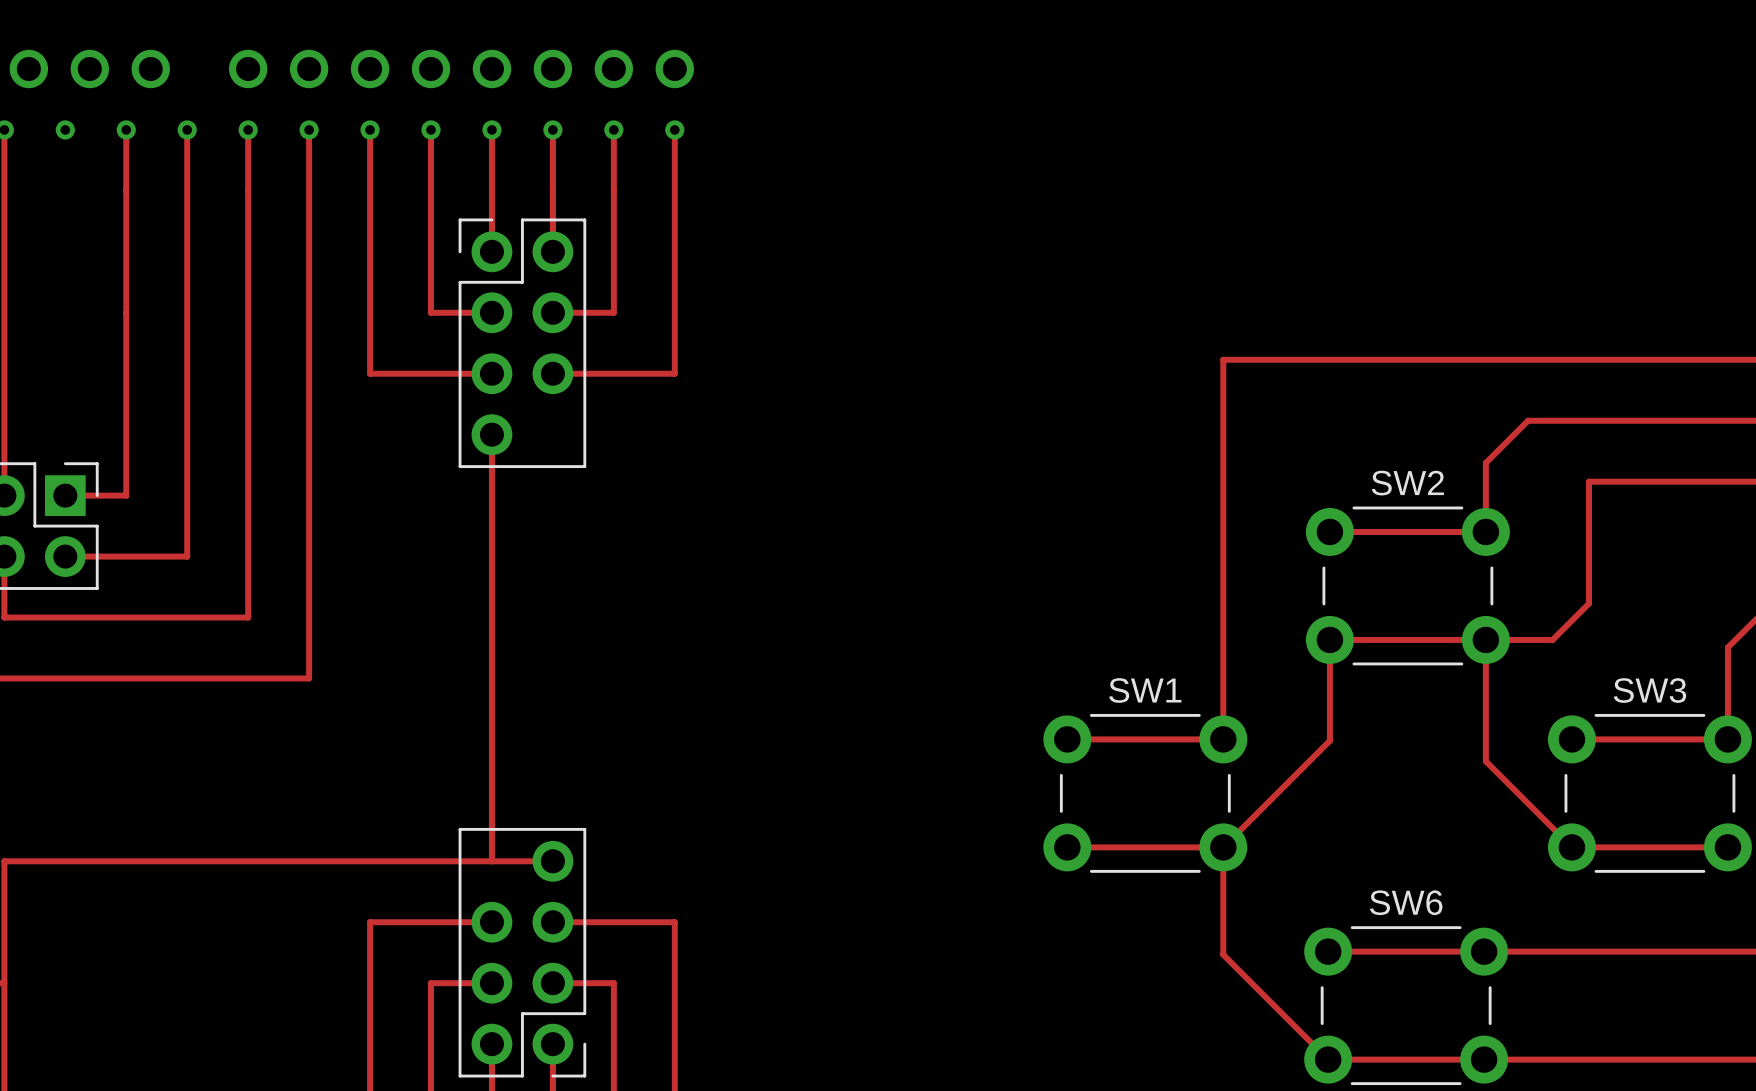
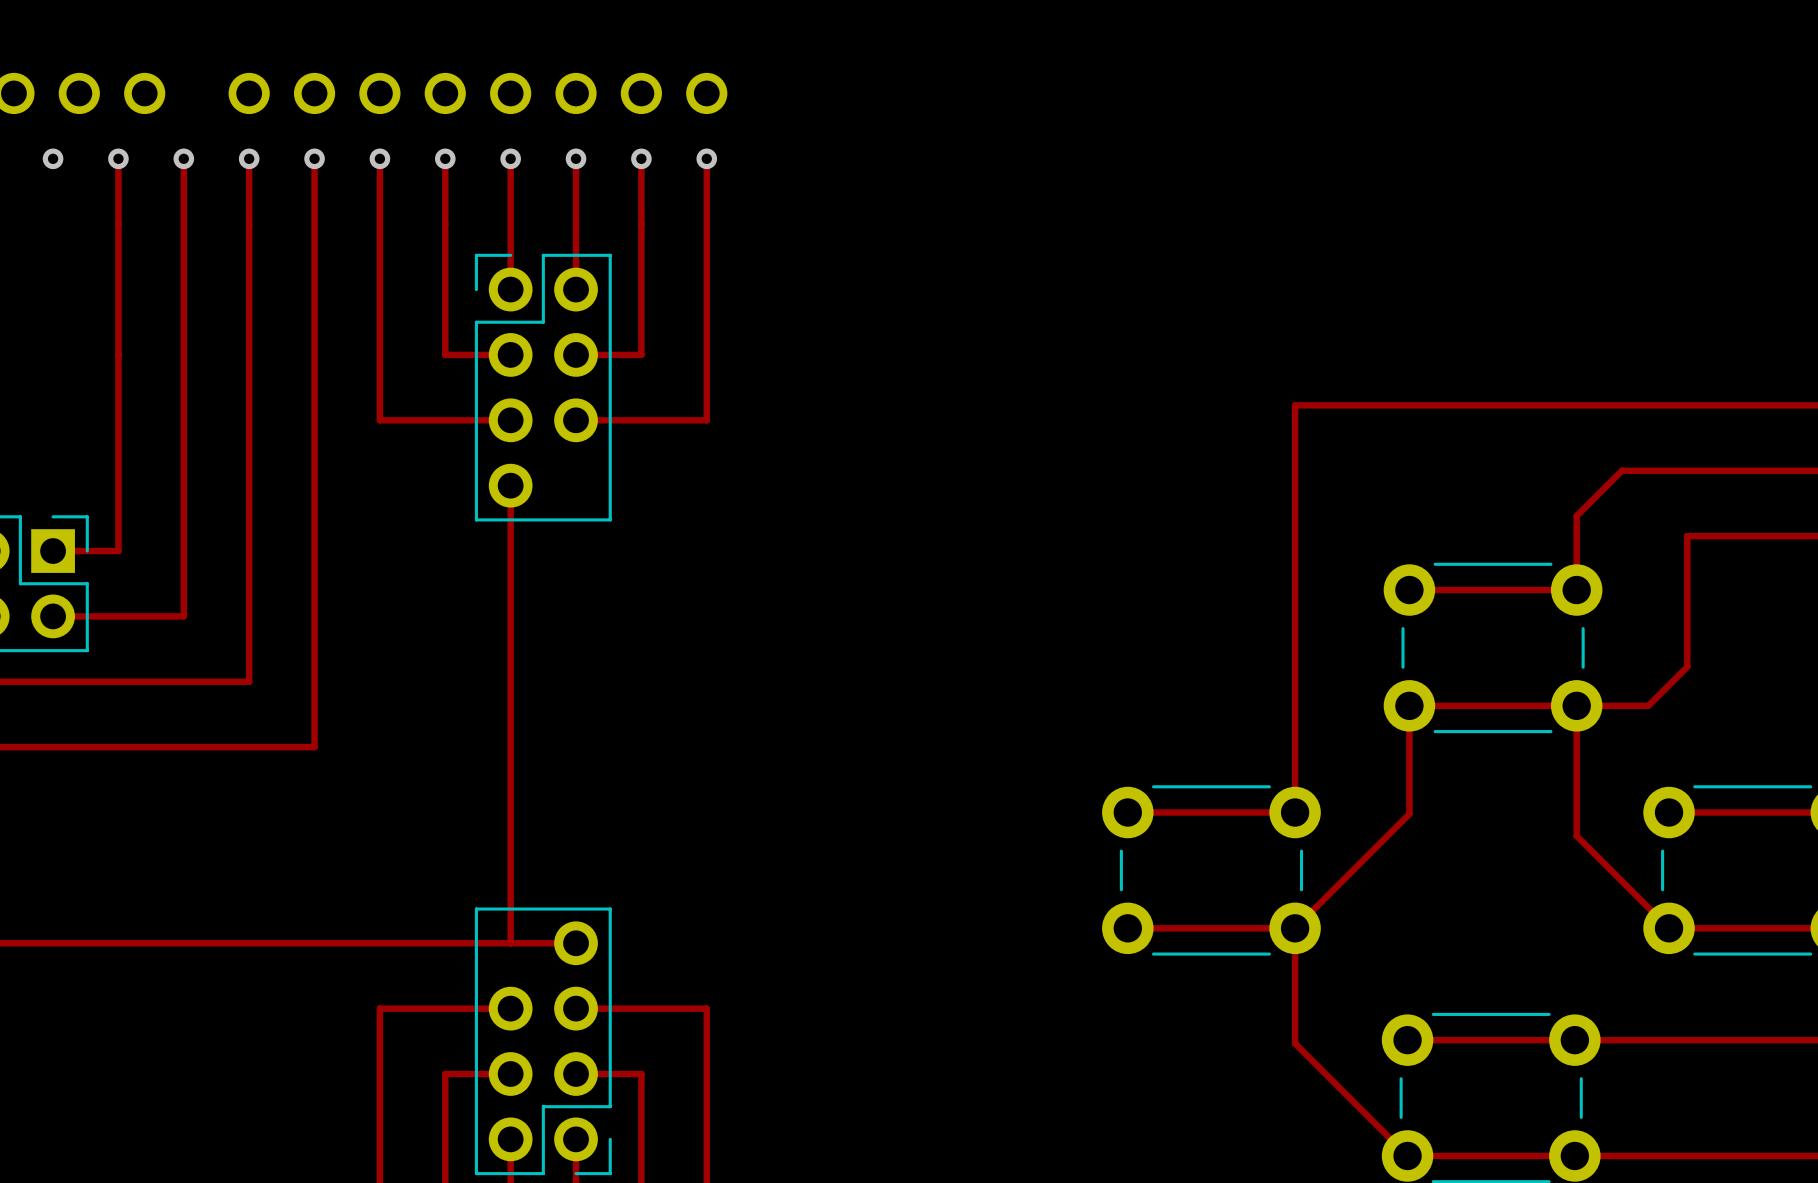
SW2 name: SW2 (1407, 483) -> none
SW1 name: SW1 (1145, 690) -> none
SW3 name: SW3 (1649, 690) -> none
SW6 name: SW6 (1406, 902) -> none

